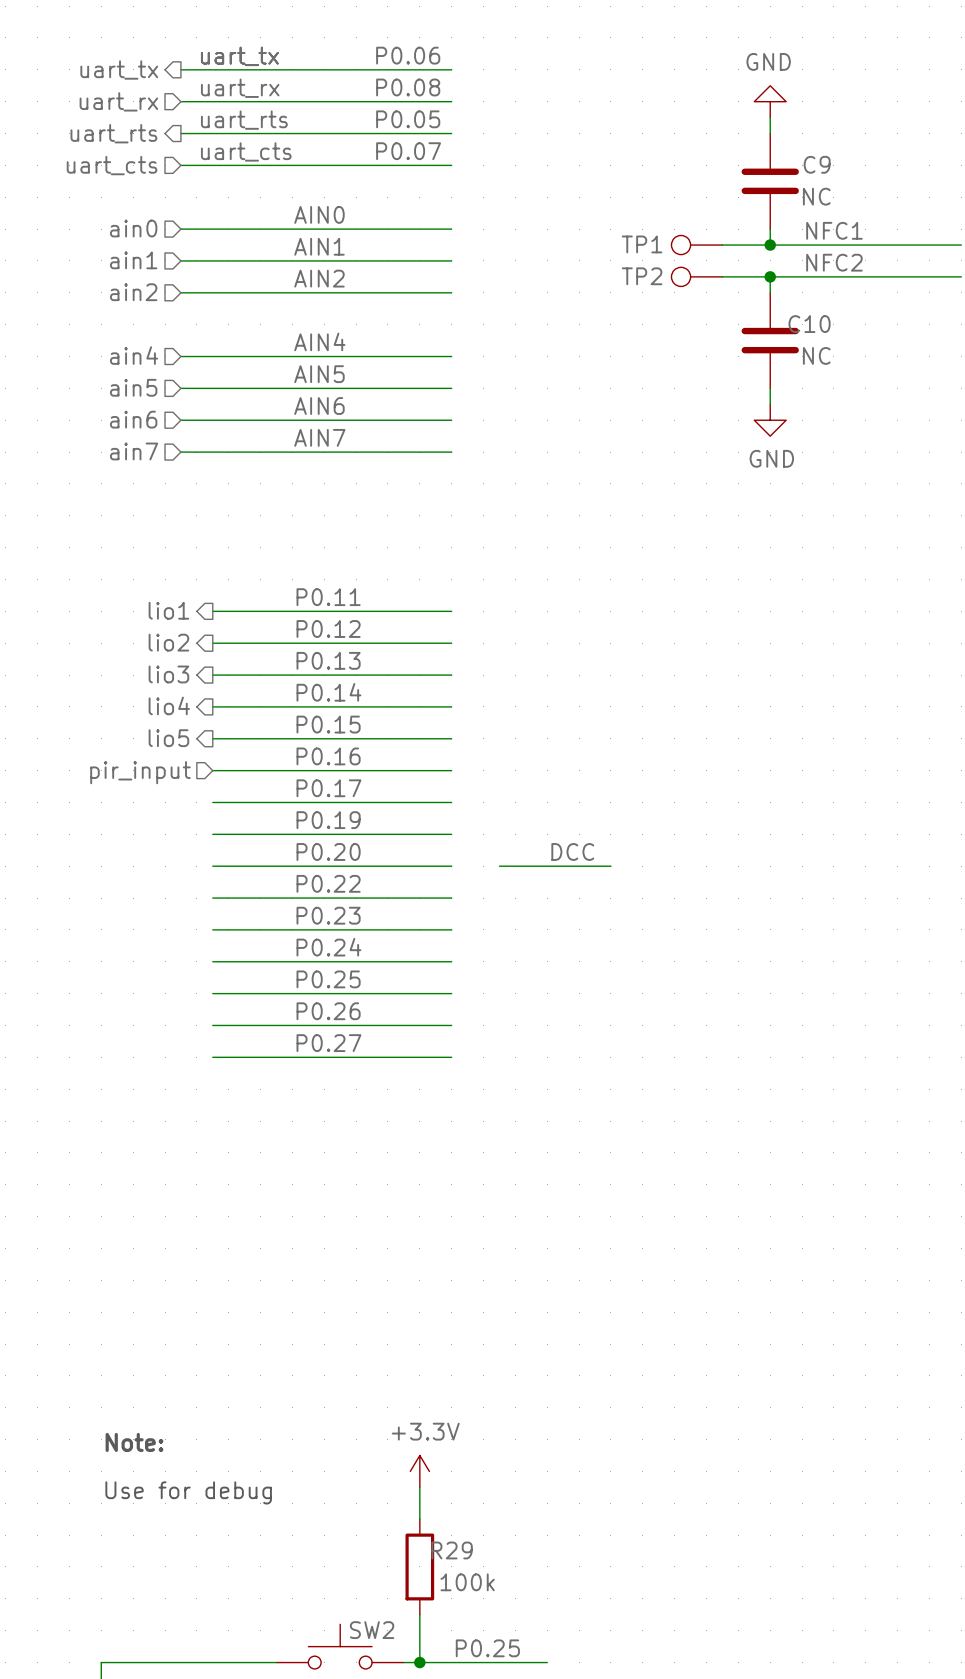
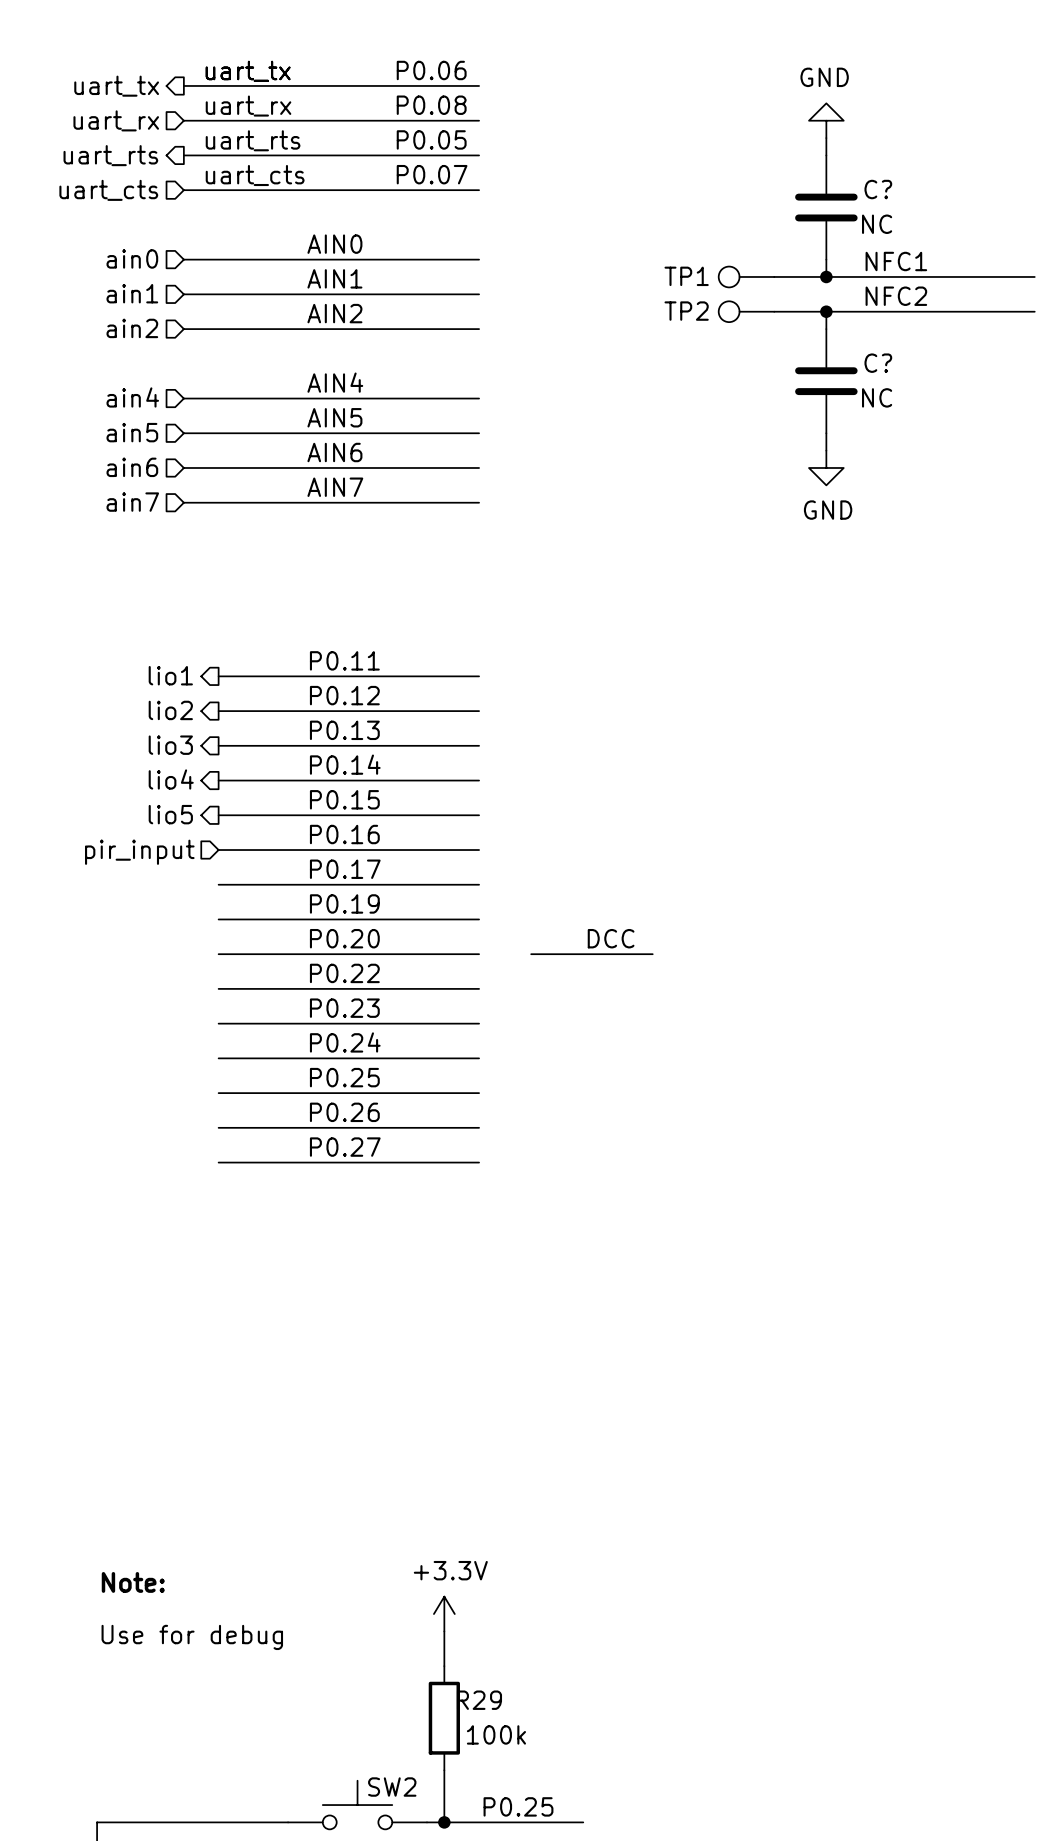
C9 name: C9 (817, 164) -> C? (878, 189)
C10 name: C10 (809, 324) -> C? (878, 363)

